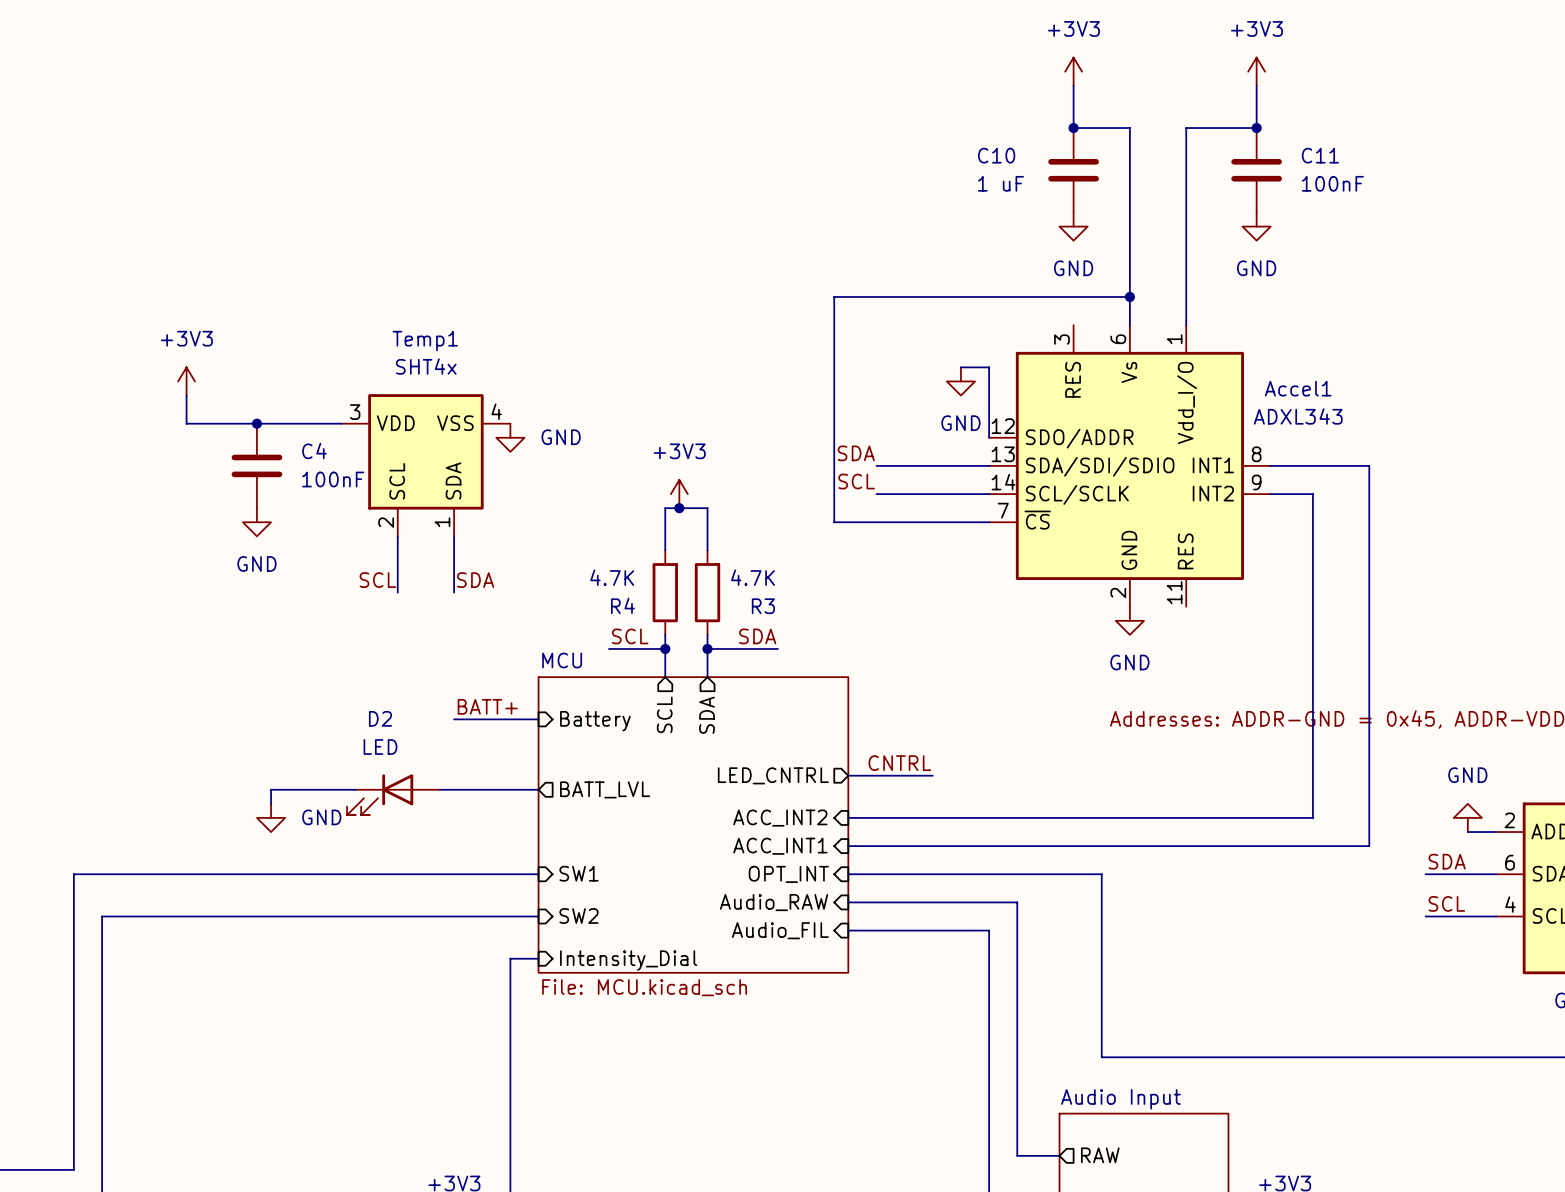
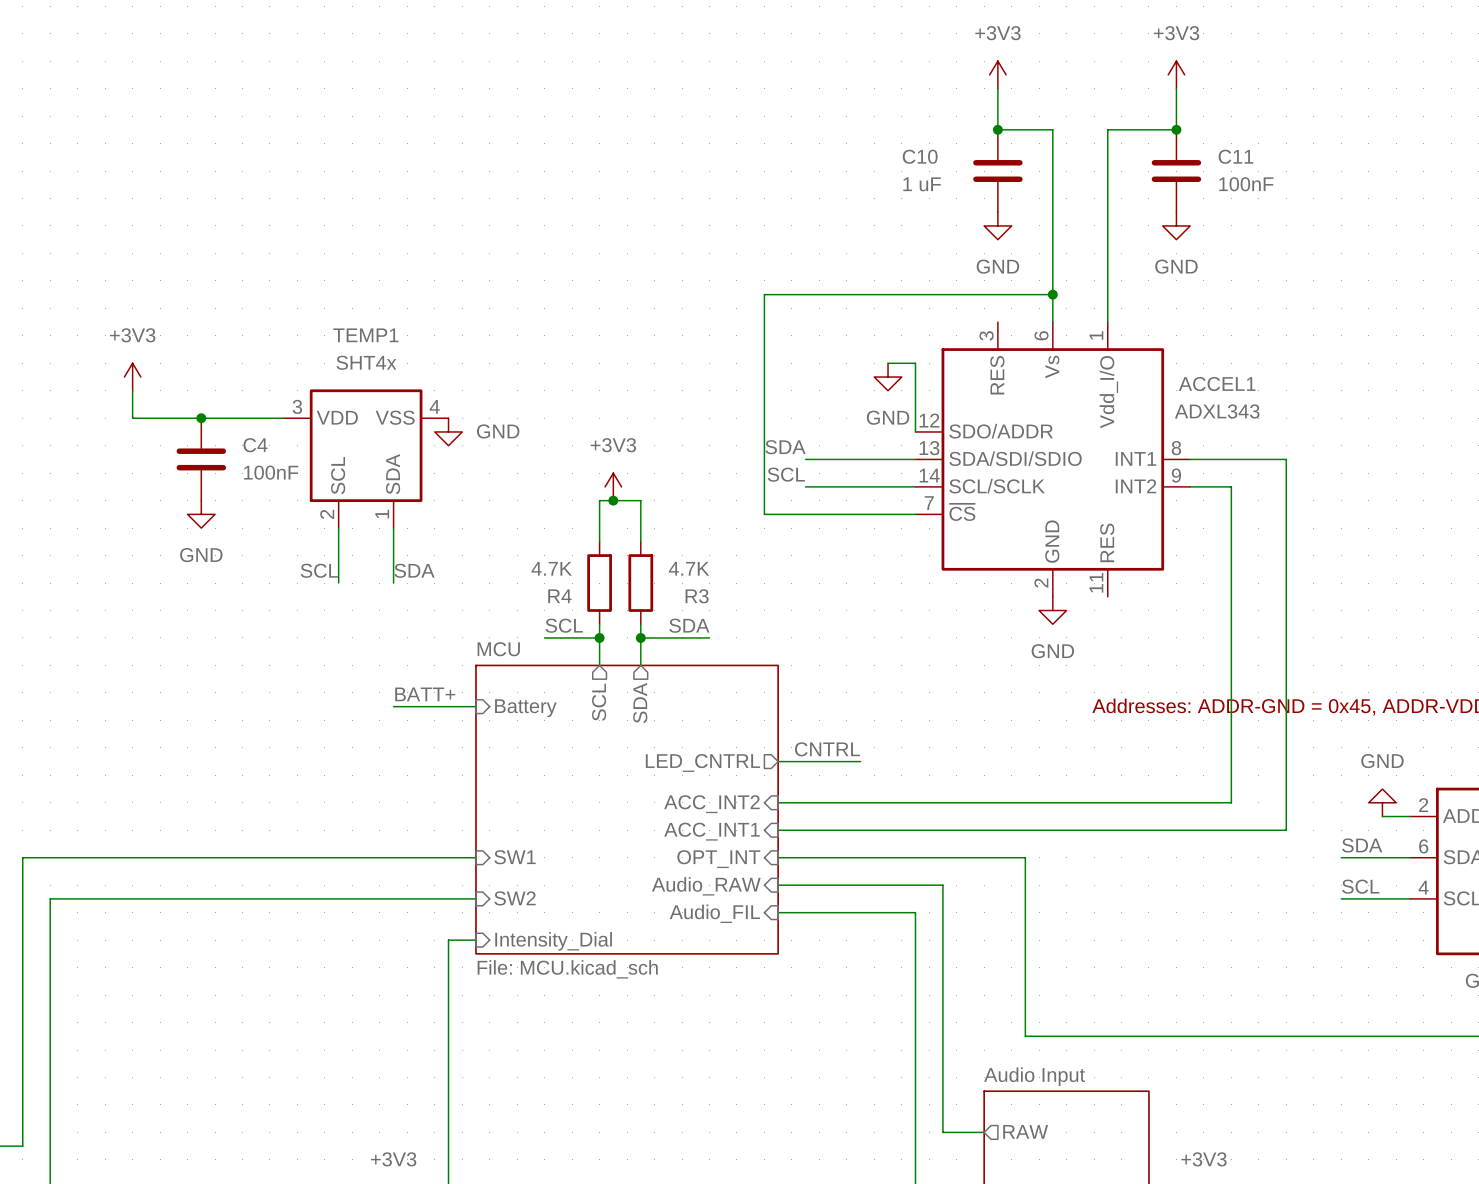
Temp1 name: Temp1 (425, 341) -> TEMP1 (365, 335)
Accel1 name: Accel1 (1298, 388) -> ACCEL1 (1217, 384)
wire: (355, 789) (271, 789) (271, 803) -> none
wire: (439, 789) (538, 789) -> none
sheet pin: BATT_LVL (605, 789) -> none
D2: LED (393, 794) -> none
power symbol: GND (271, 817) -> none

